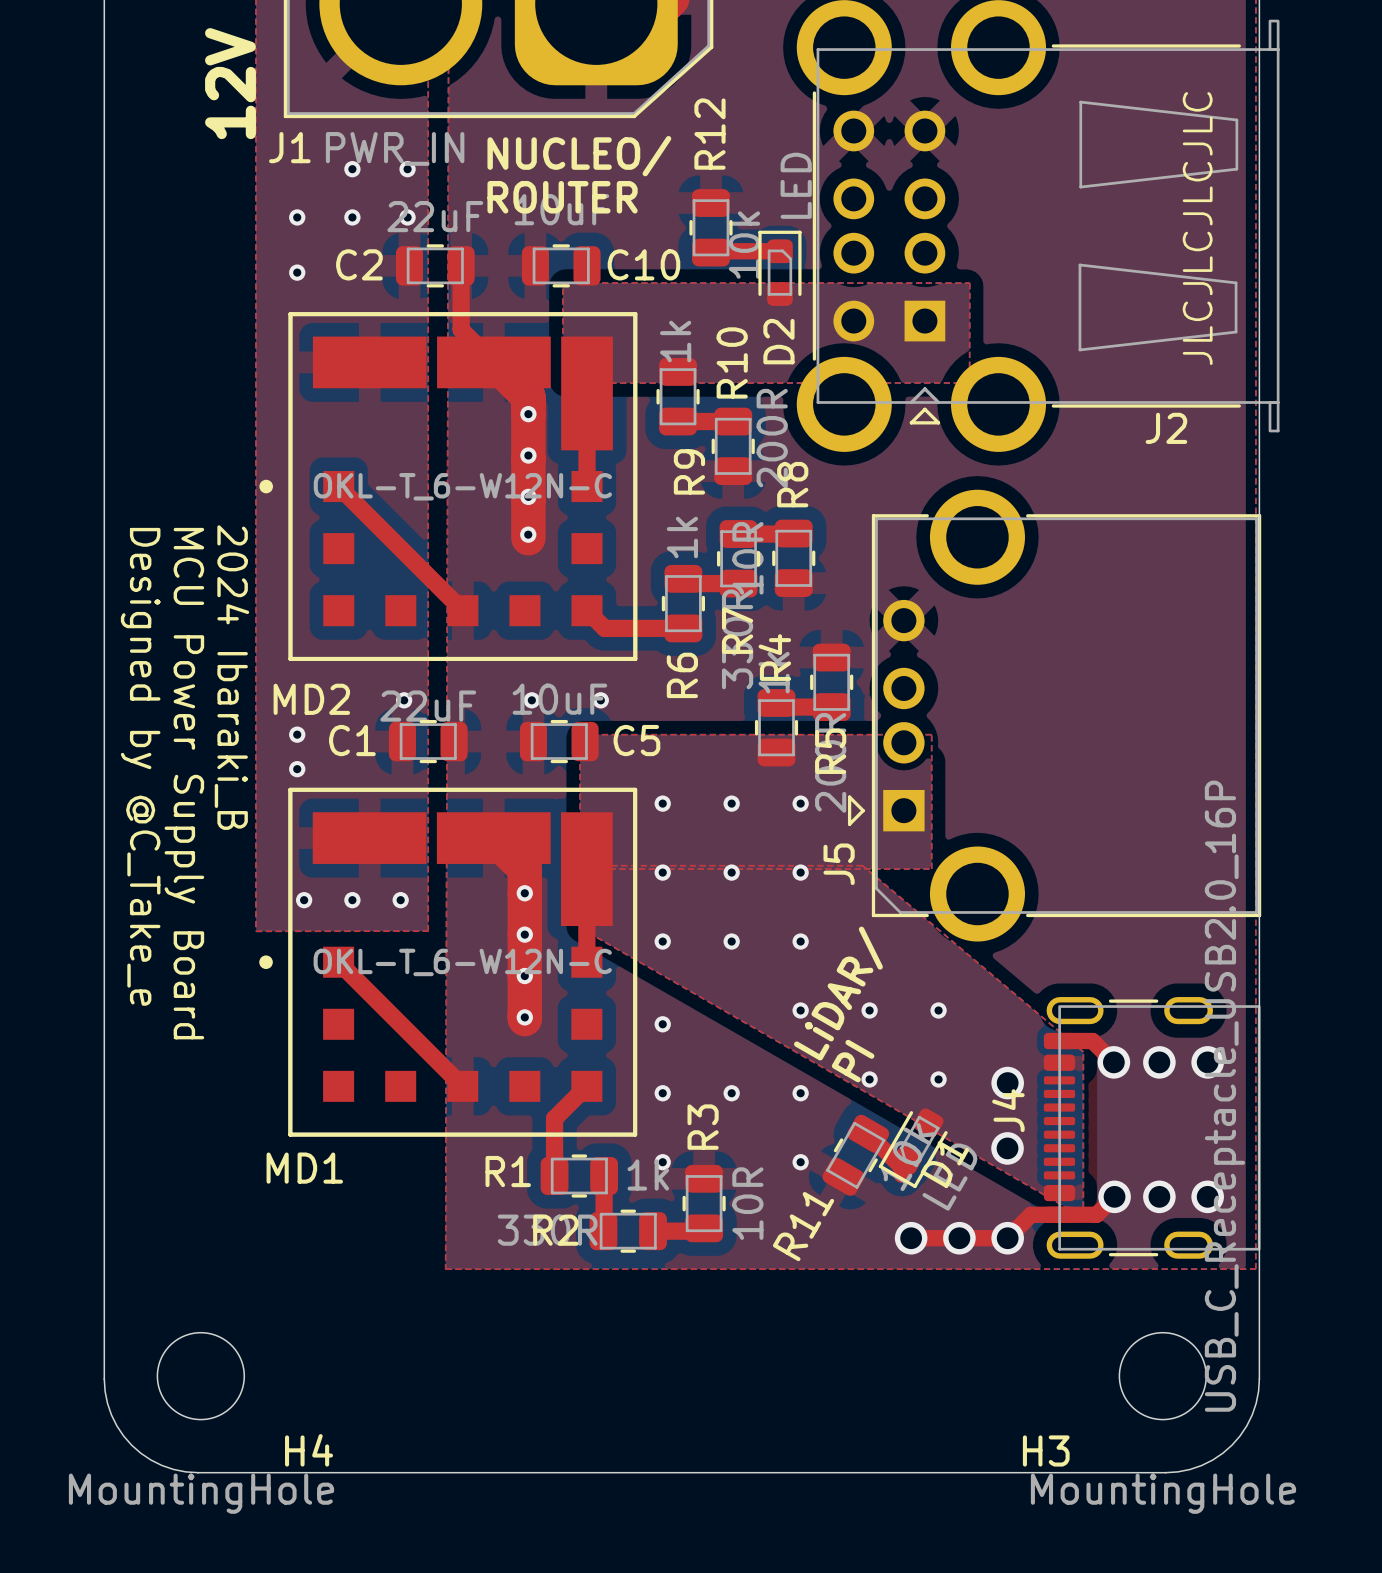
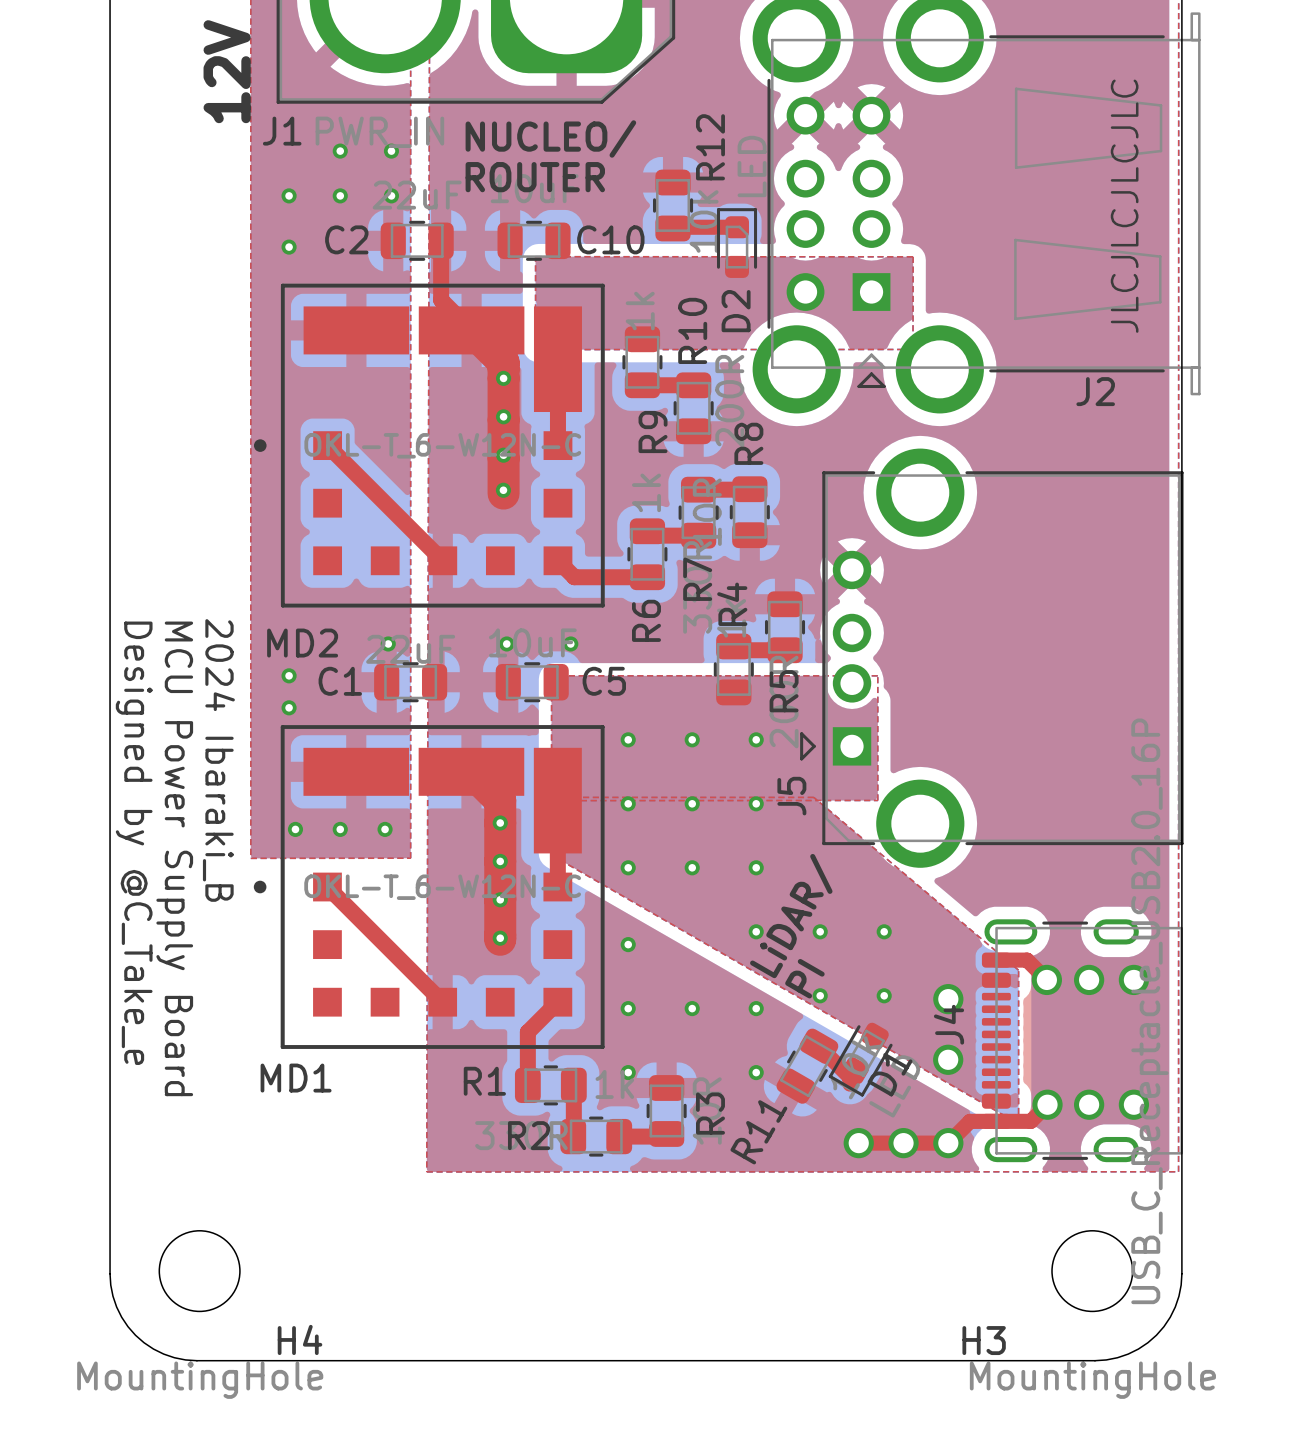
R12 name position: R12 (709, 134) -> R12 (710, 147)
text position: 2024 Ibaraki_B (231, 677) -> 2024 Ibaraki_B (218, 760)
text position: Designed by @C_Take_e (140, 766) -> Designed by @C_Take_e (134, 843)
text position: MCU Power Supply Board (184, 783) -> MCU Power Supply Board (174, 858)
R3 name position: R3 (703, 1127) -> R3 (710, 1113)

